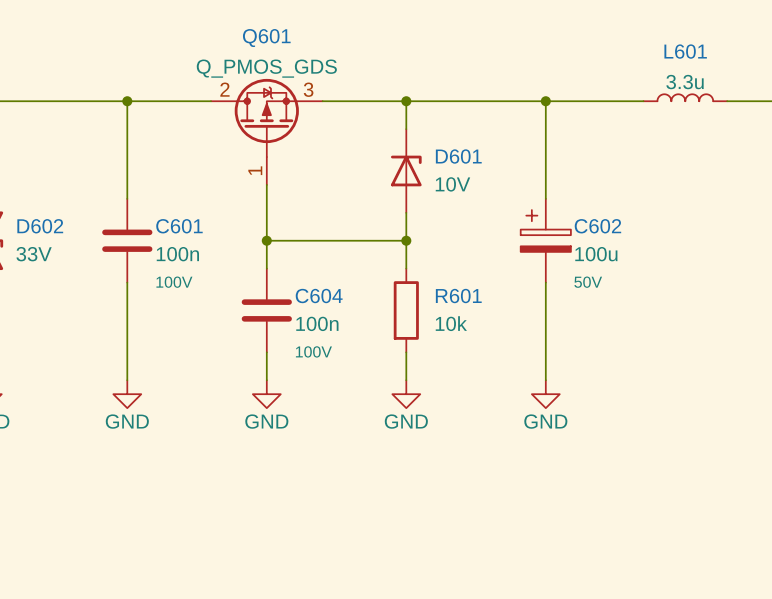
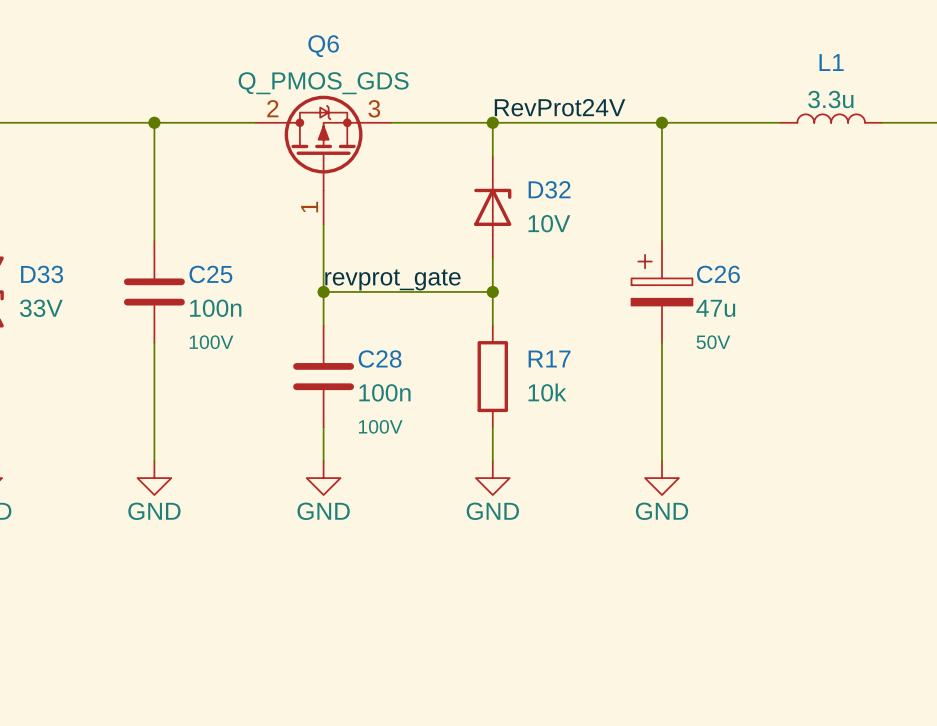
Q601 name: Q601 (266, 38) -> Q6 (323, 46)
L601 name: L601 (685, 51) -> L1 (831, 62)
label: none -> RevProt24V (560, 107)
D601 name: D601 (458, 156) -> D32 (549, 189)
D602 name: D602 (40, 226) -> D33 (42, 274)
C601 name: C601 (179, 226) -> C25 (210, 274)
C602 name: C602 (597, 226) -> C26 (718, 274)
label: none -> revprot_gate (392, 279)
C602 value: 100u (596, 254) -> 47u (715, 308)
C604 name: C604 (319, 296) -> C28 (380, 359)
R601 name: R601 (458, 296) -> R17 (549, 359)

